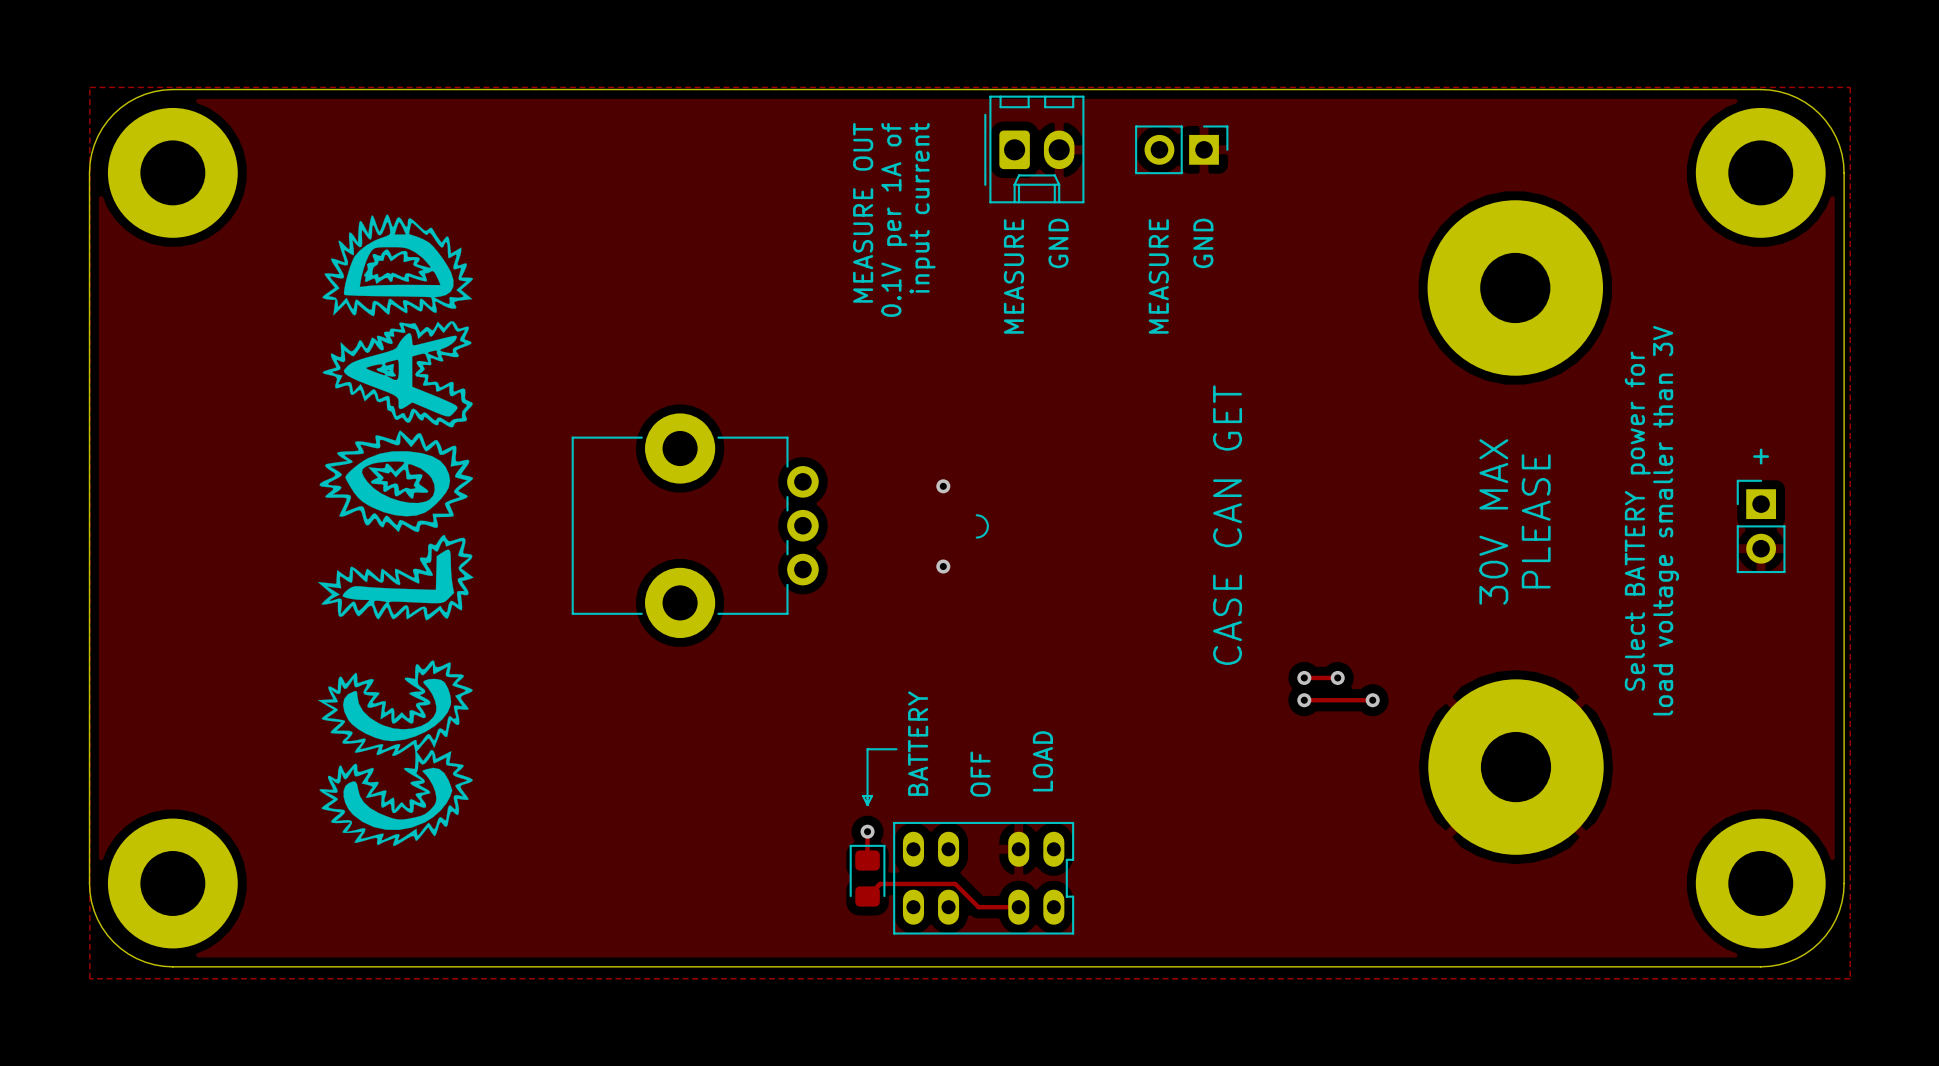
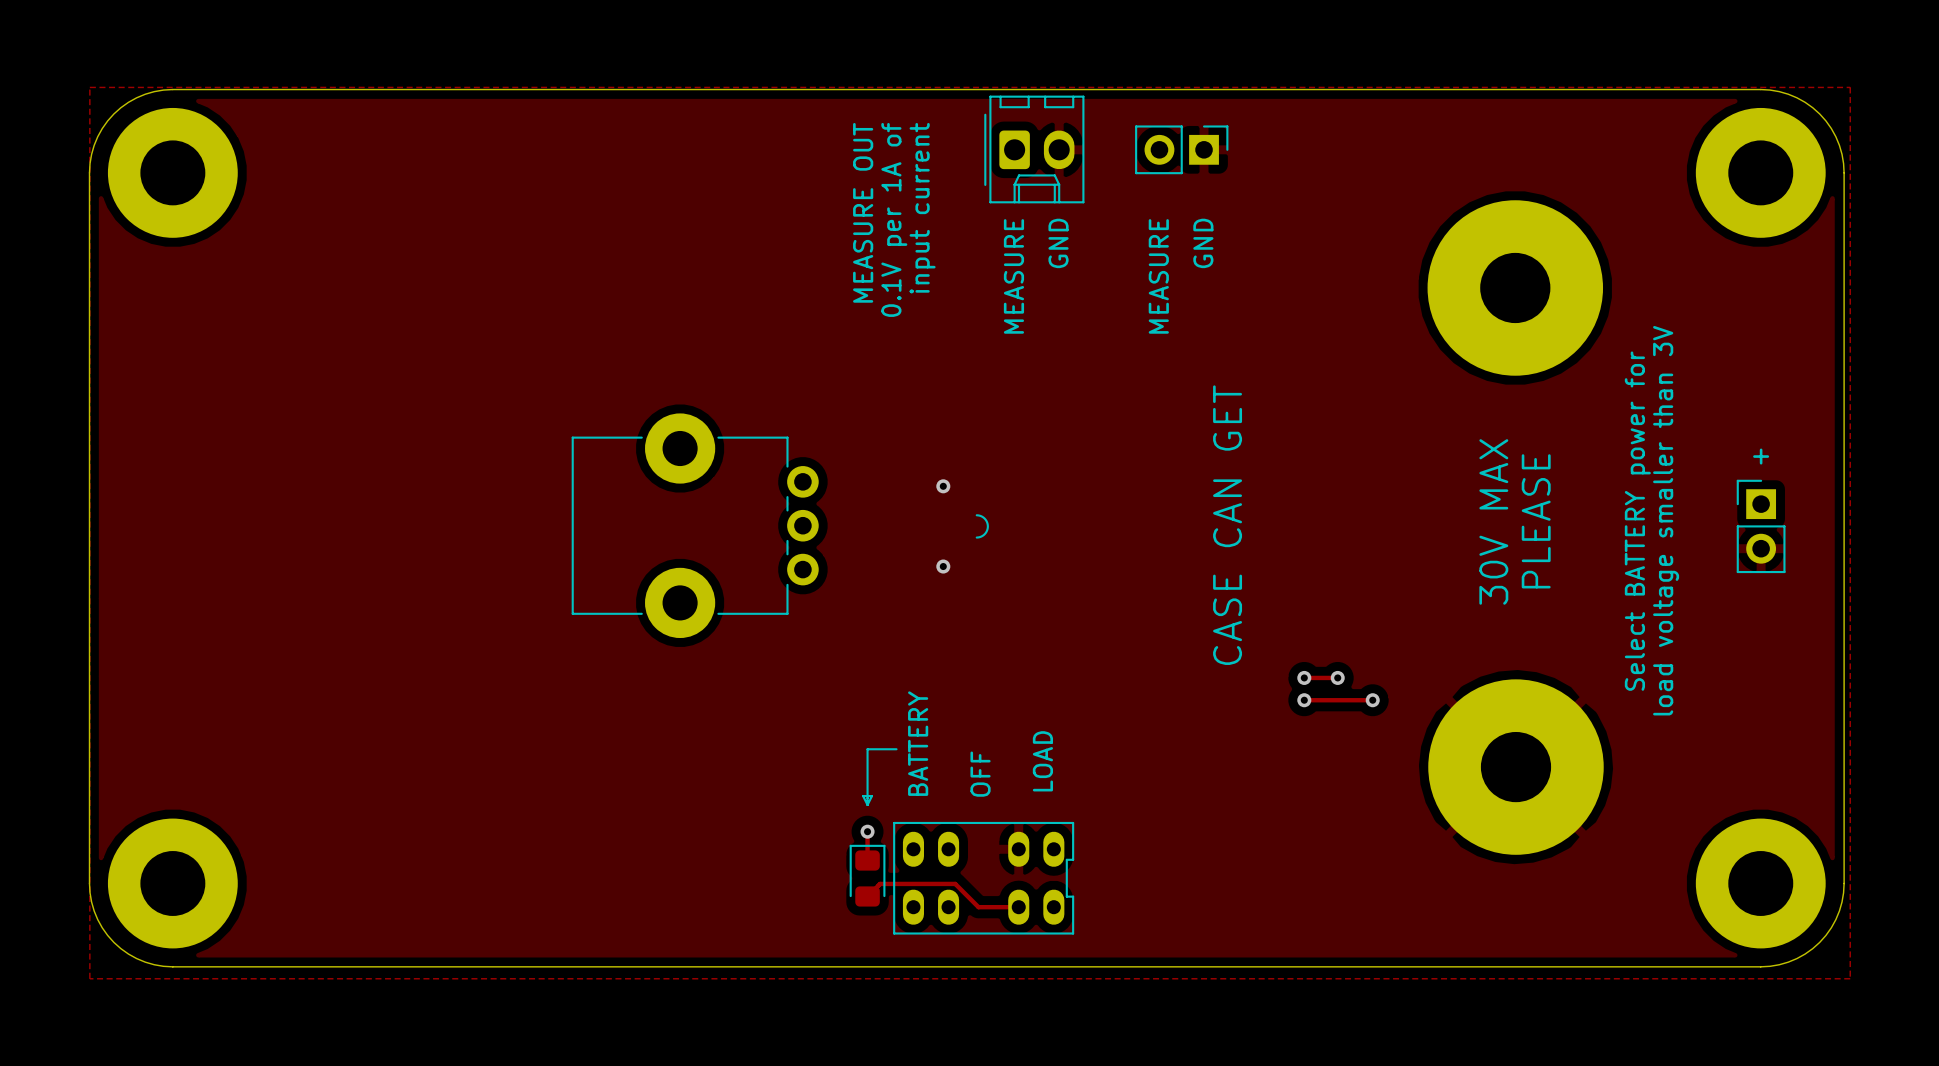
drawing: [317, 214, 474, 847] -> none

